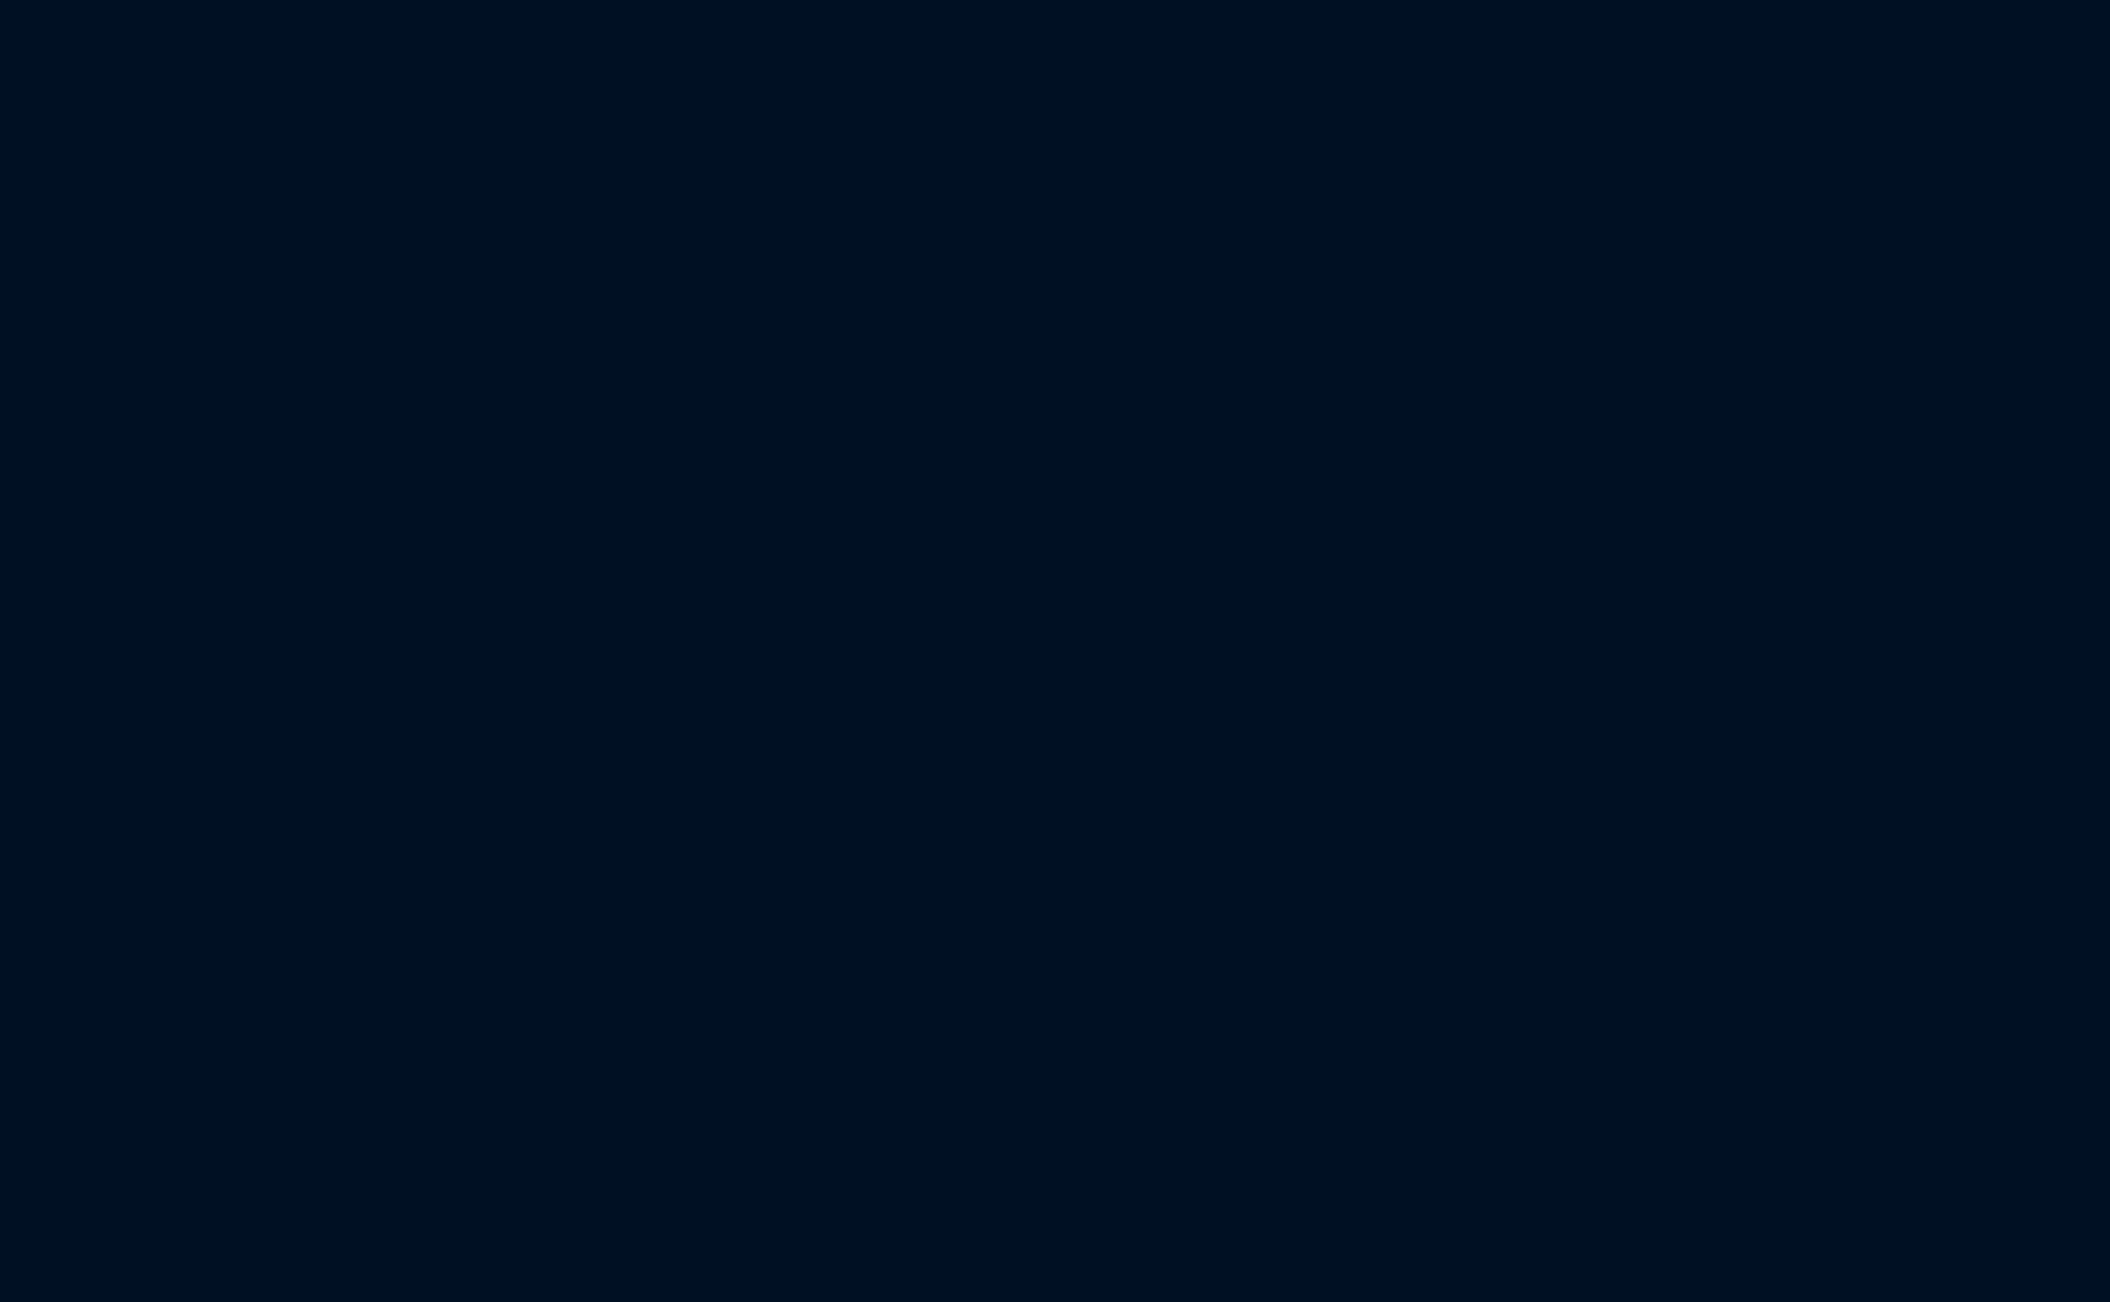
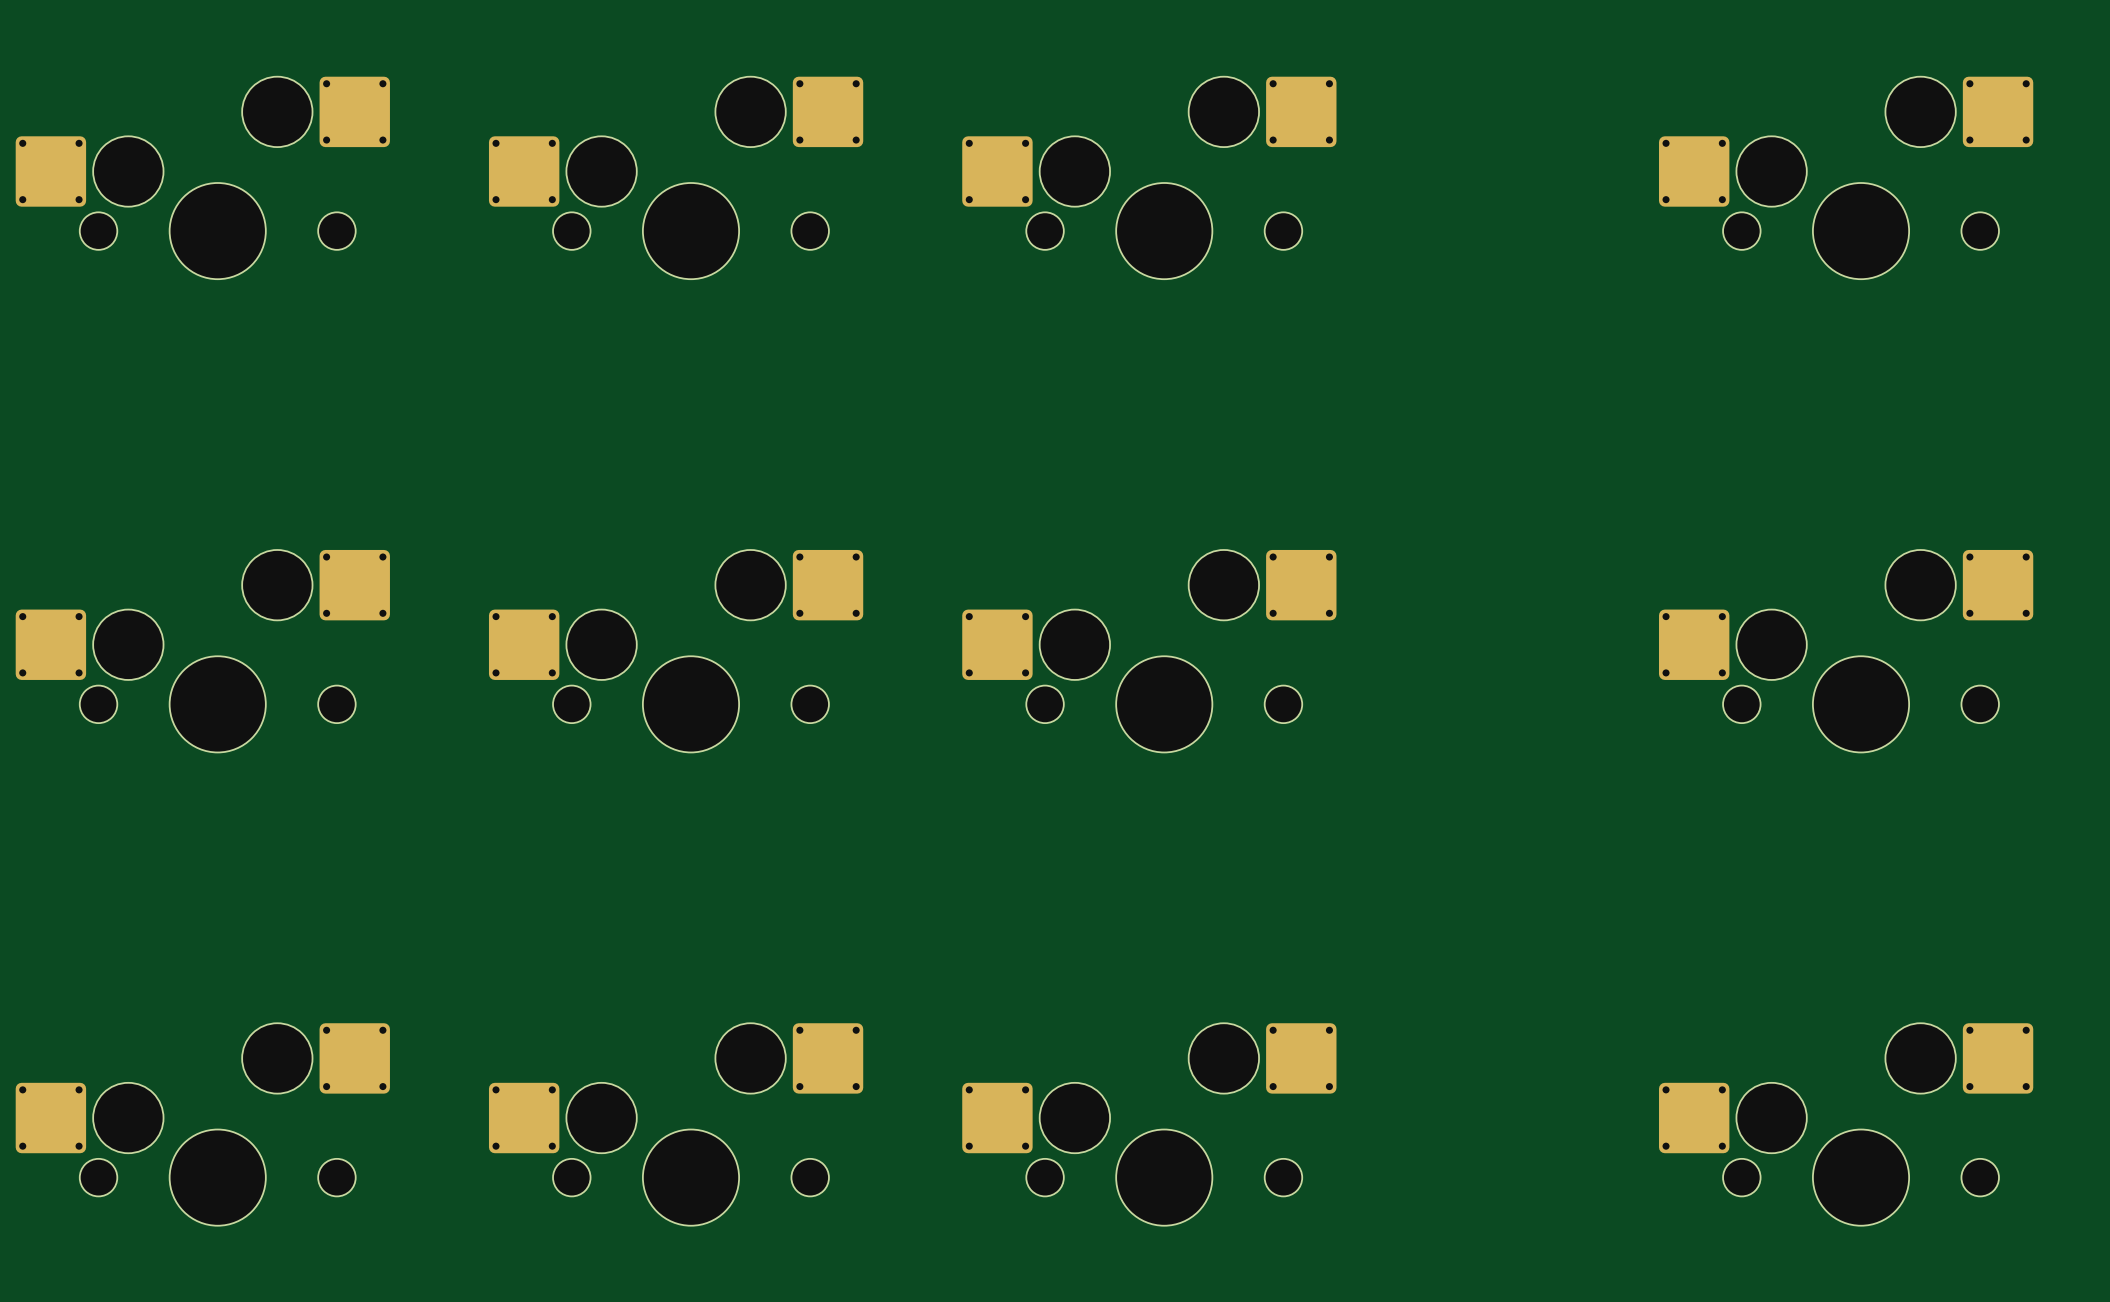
part: none -> (202, 177)
part: none -> (676, 177)
part: none -> (1149, 177)
part: none -> (1846, 177)
part: none -> (202, 651)
part: none -> (676, 651)
part: none -> (1149, 651)
part: none -> (1846, 651)
part: none -> (202, 1124)
part: none -> (676, 1124)
part: none -> (1149, 1124)
part: none -> (1846, 1124)

